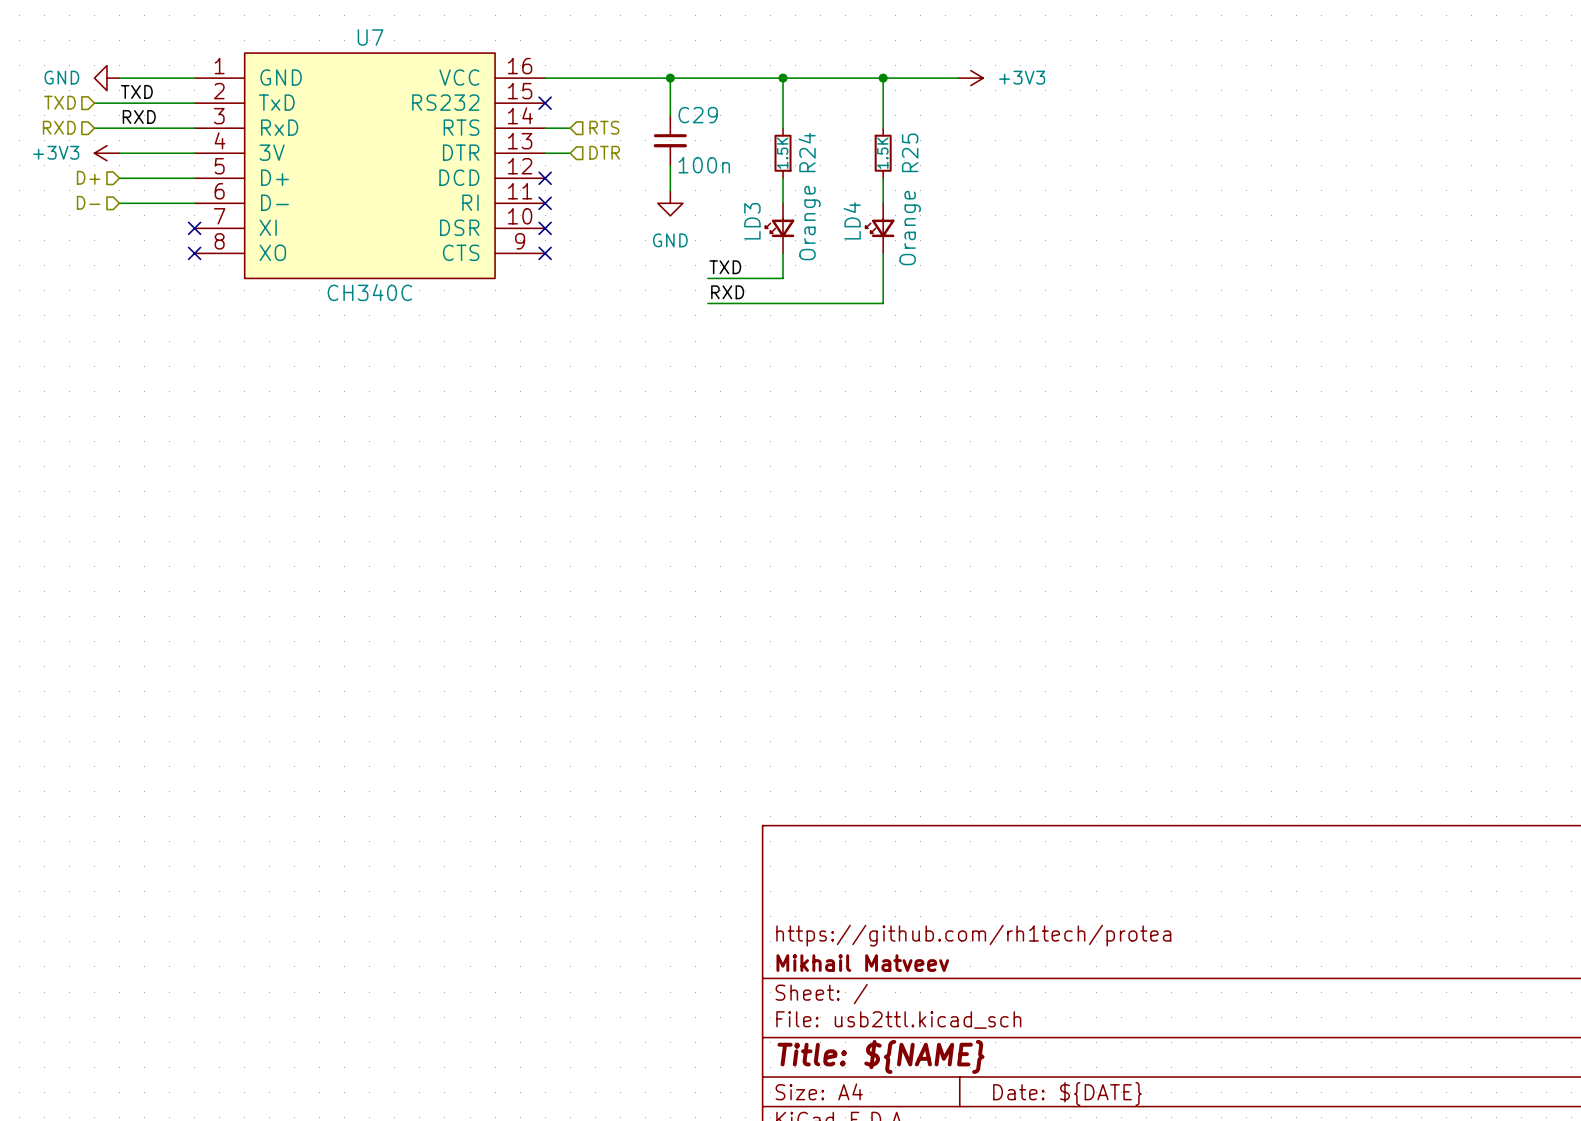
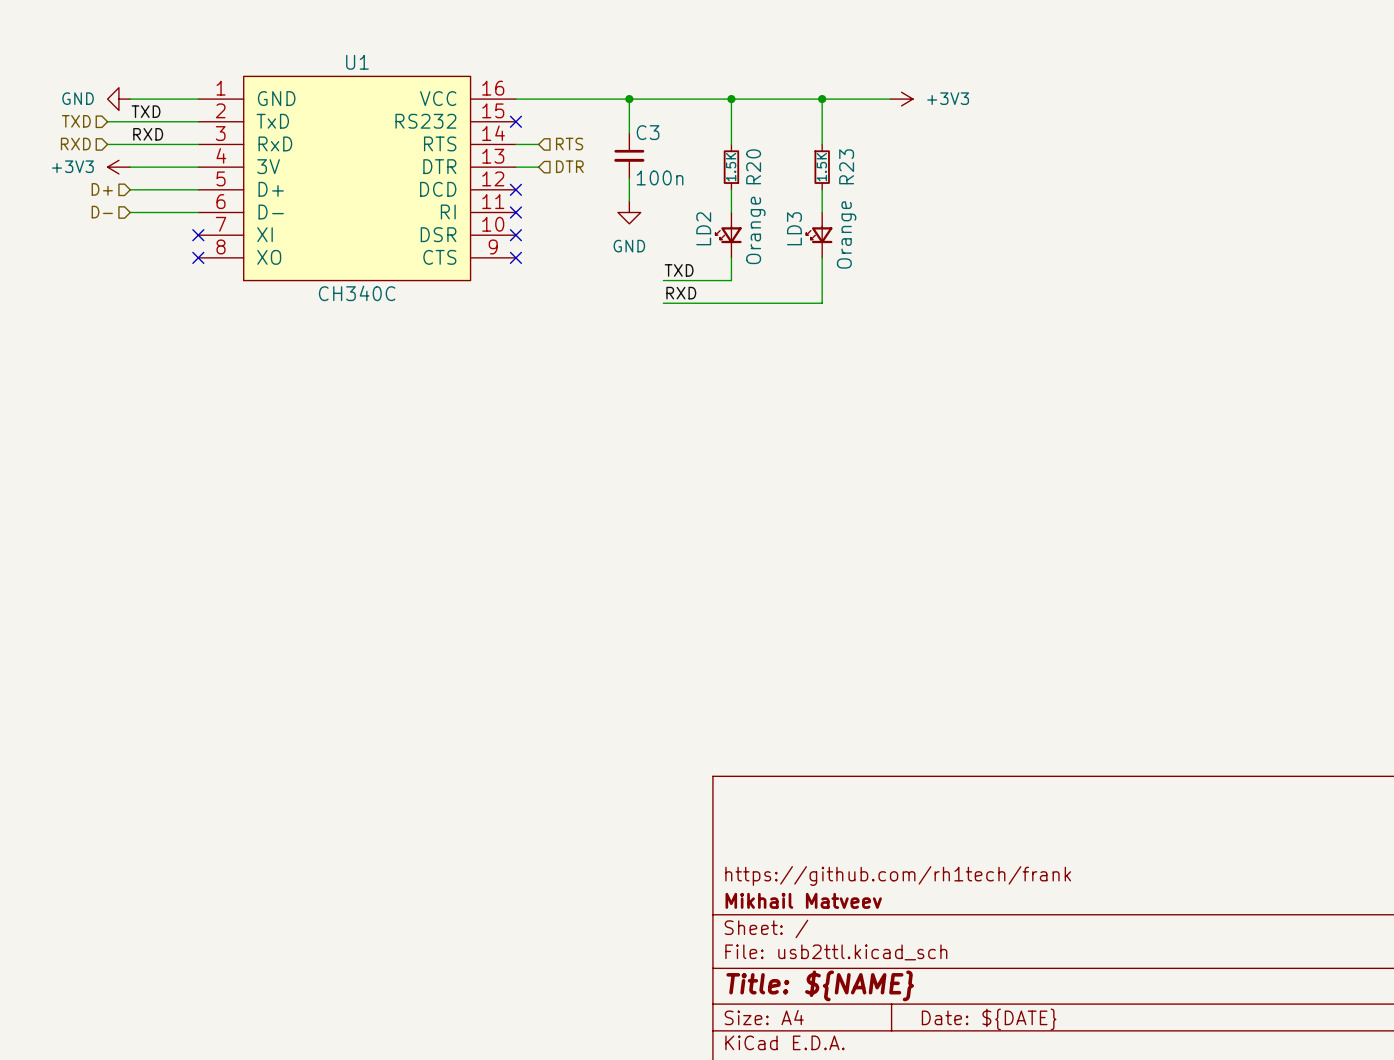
U7 name: U7 (370, 37) -> U1 (357, 62)
C29 name: C29 (698, 115) -> C3 (648, 132)
R24 name: R24 (807, 152) -> R20 (753, 166)
R25 name: R25 (910, 152) -> R23 (846, 166)
LD4 name: LD4 (852, 220) -> LD3 (794, 228)
LD3 name: LD3 (752, 221) -> LD2 (703, 228)
title block: https://github.com/rh1tech/protea (973, 935) -> https://github.com/rh1tech/frank (898, 875)

